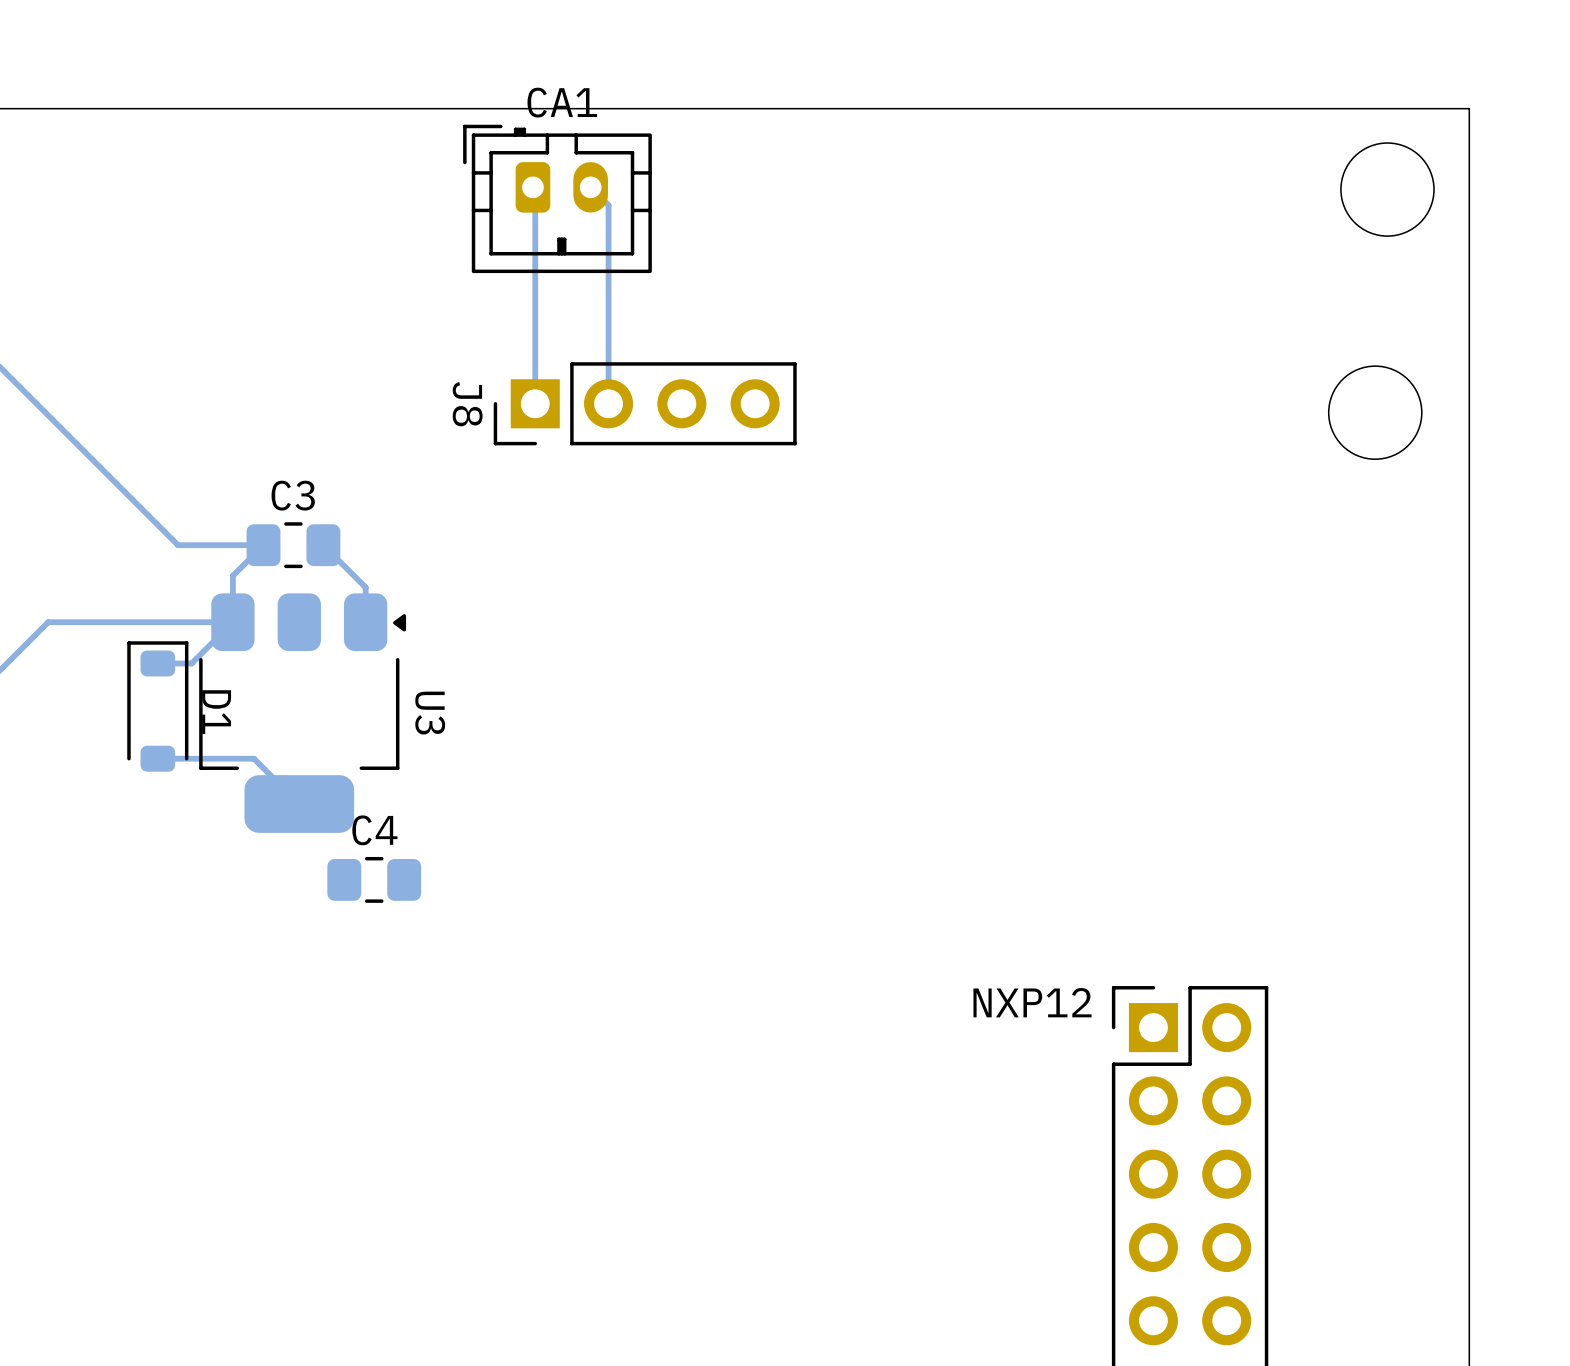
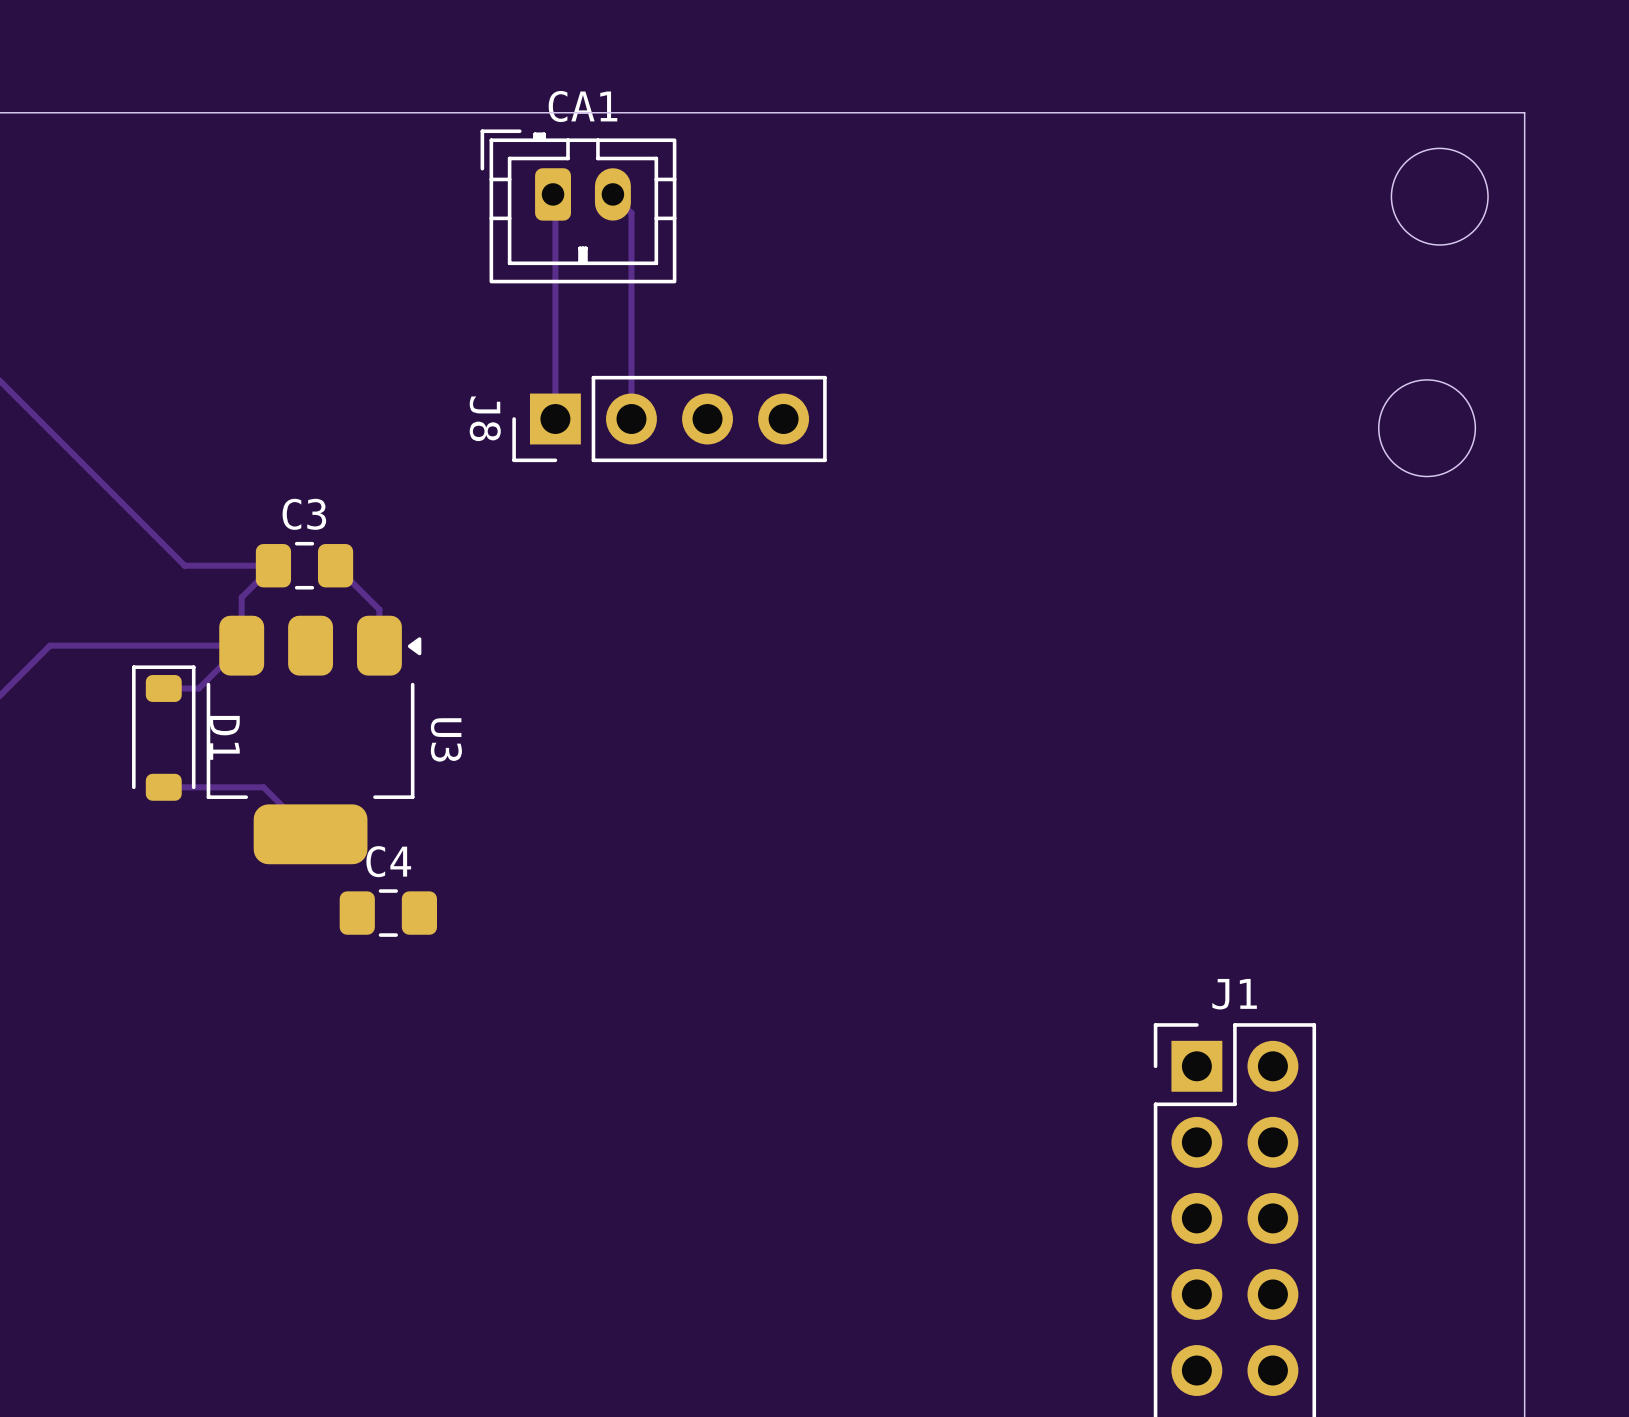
NXP12 name: NXP12 (1032, 1002) -> J1 (1234, 994)

